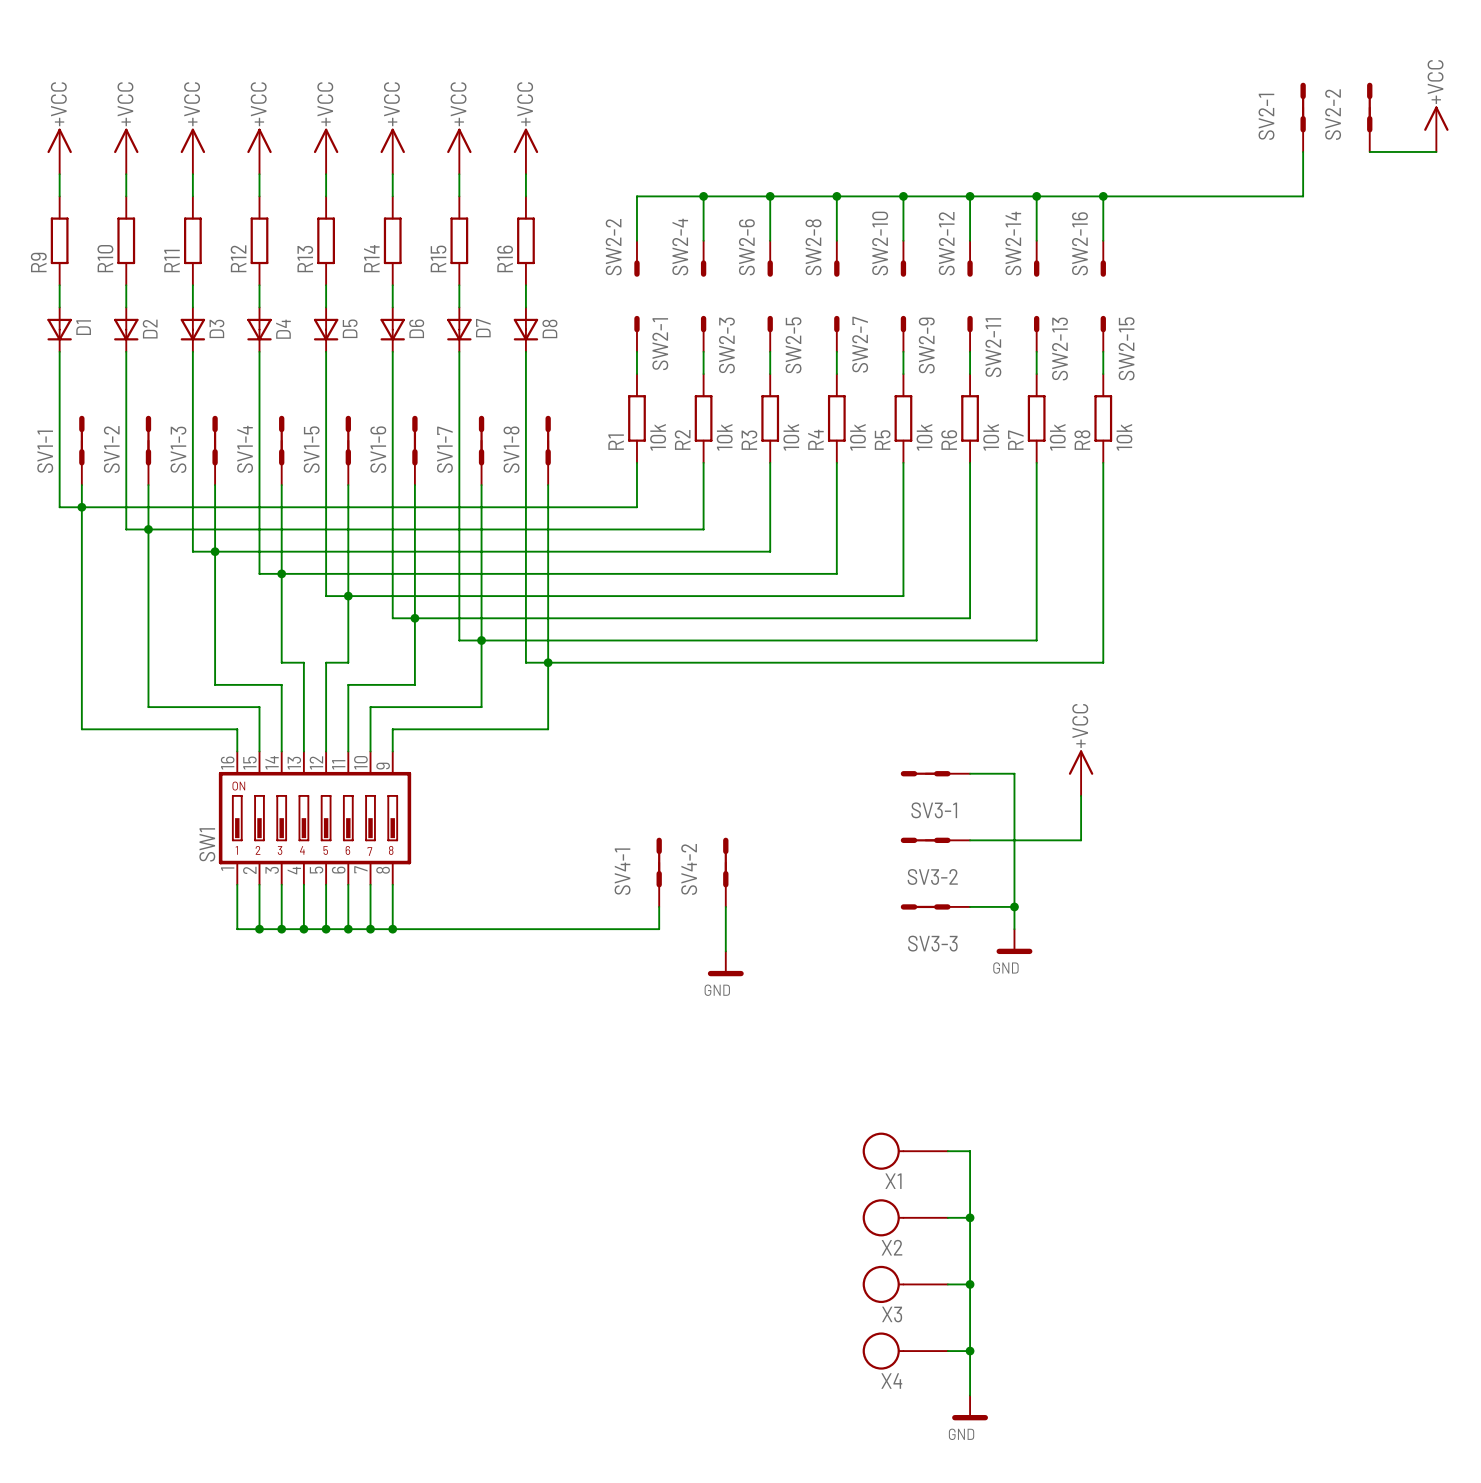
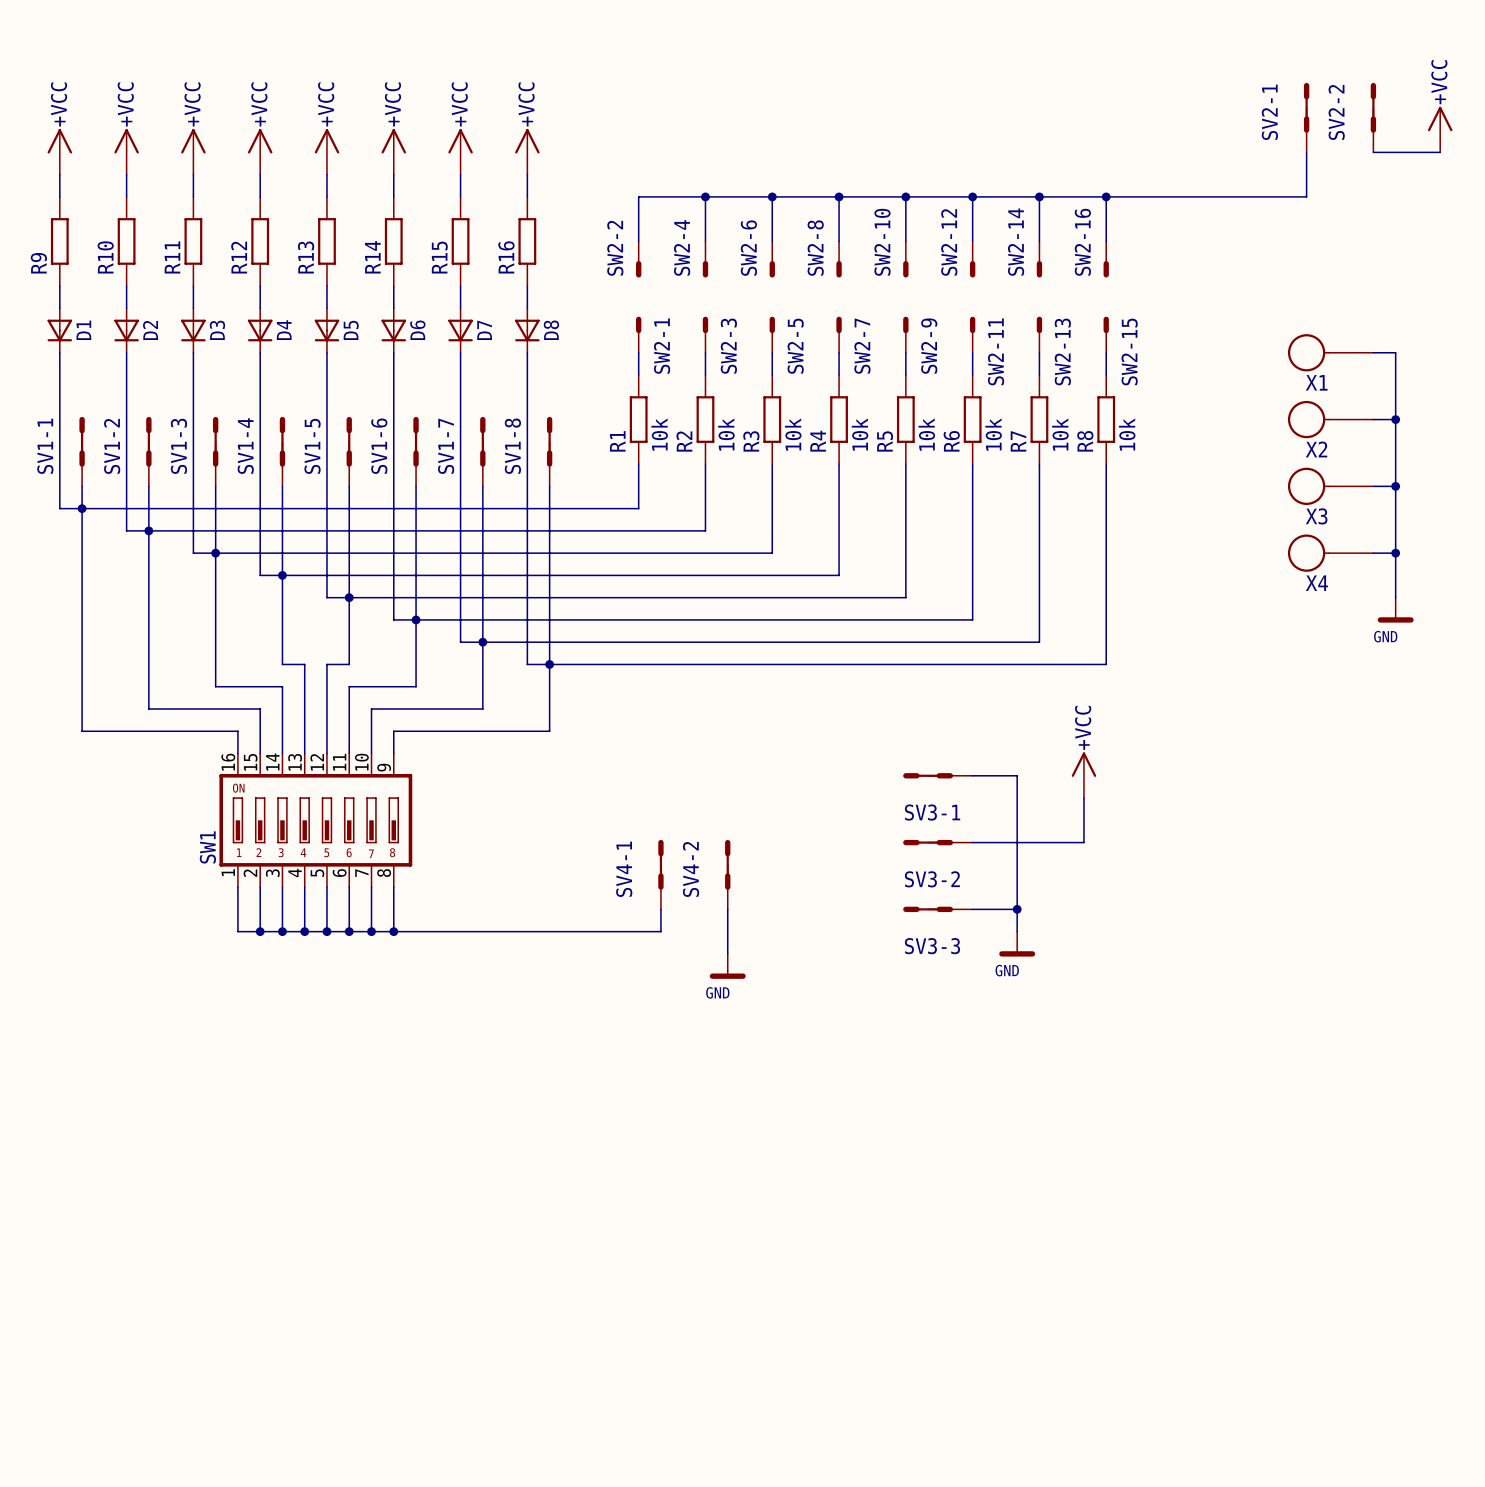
wire: none -> (1373, 352) (1395, 352) (1395, 597)
wire: none -> (1373, 419) (1395, 419)
junction: none -> (1395, 419)
wire: none -> (1373, 486) (1395, 486)
junction: none -> (1395, 486)
wire: none -> (1373, 553) (1395, 553)
junction: none -> (1395, 553)
power symbol: none -> (1395, 610)
X1 position: (905, 1151) -> (1330, 352)
wire: (947, 1151) (970, 1151) (970, 1395) -> none
X2 position: (905, 1217) -> (1330, 419)
wire: (947, 1217) (970, 1217) -> none
junction: (970, 1217) -> none
X3 position: (905, 1284) -> (1330, 486)
wire: (947, 1284) (970, 1284) -> none
junction: (970, 1284) -> none
X4 position: (905, 1351) -> (1330, 553)
wire: (947, 1351) (970, 1351) -> none
junction: (970, 1351) -> none
power symbol: (970, 1407) -> none

